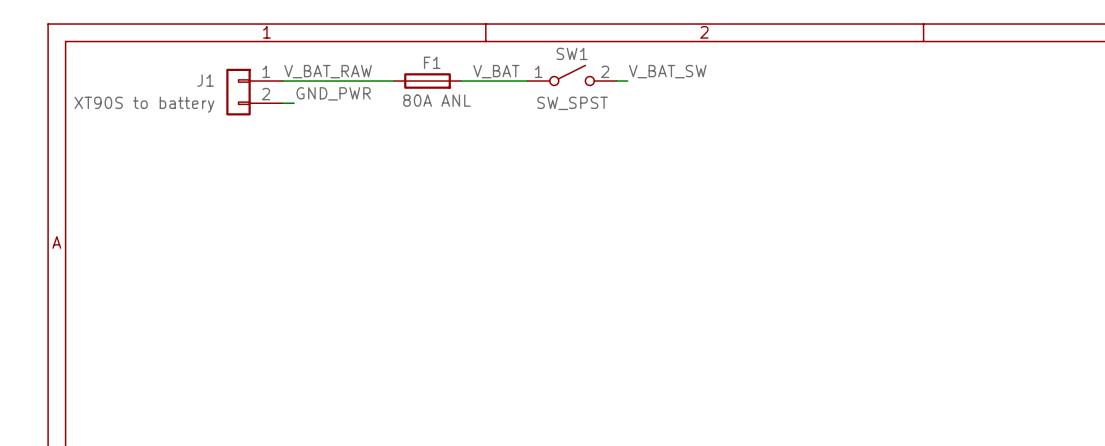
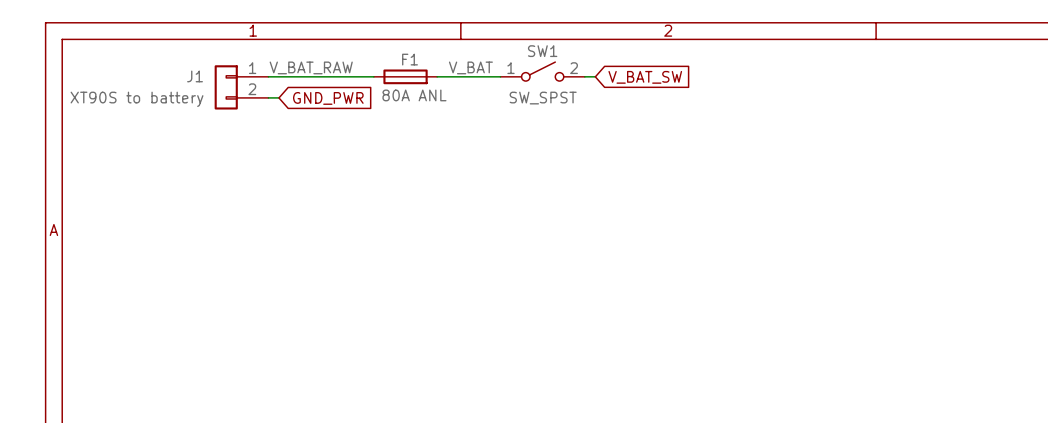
label: V_BAT_SW (667, 71) -> none
global label: none -> V_BAT_SW (645, 77)
label: GND_PWR (333, 93) -> none
global label: none -> GND_PWR (328, 98)

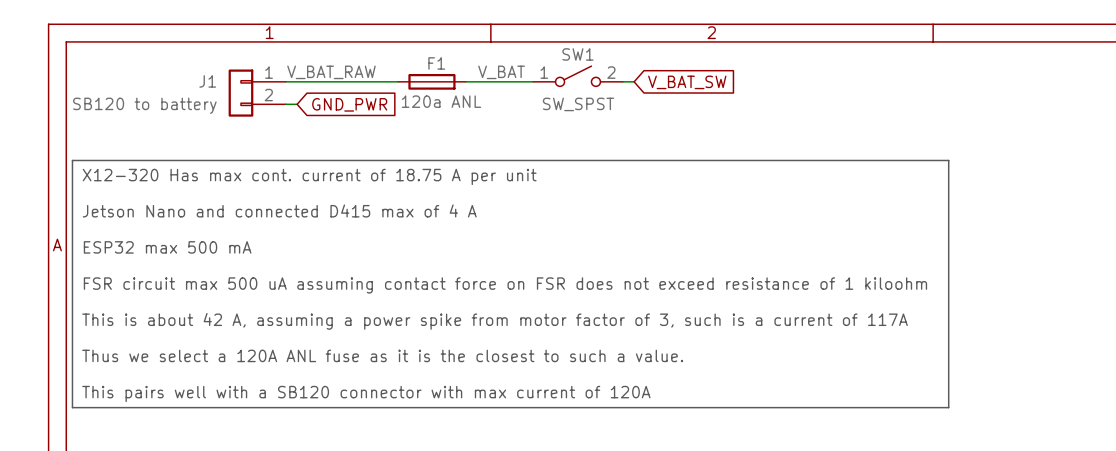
F1 value: 80A ANL (414, 95) -> 120a ANL (441, 101)
J1 value: XT90S to battery (137, 99) -> SB120 to battery (144, 105)
line: none -> (72, 160) (948, 160) (948, 407) (72, 407) (72, 160)
text: none -> X12-320 Has max cont. current of 18.75 A per unit (309, 176)
text: none -> Jetson Nano and connected D415 max of 4 A (279, 210)
text: none -> ESP32 max 500 mA (167, 247)
text: none -> FSR circuit max 500 uA assuming contact force on FSR does not exceed resistance of 1 kiloohm (505, 285)
text: none -> This is about 42 A, assuming a power spike from motor factor of 3, such is a current of 117A (495, 321)
text: none -> Thus we select a 120A ANL fuse as it is the closest to such a value. (382, 355)
text: none -> This pairs well with a SB120 connector with max current of 120A (366, 393)

